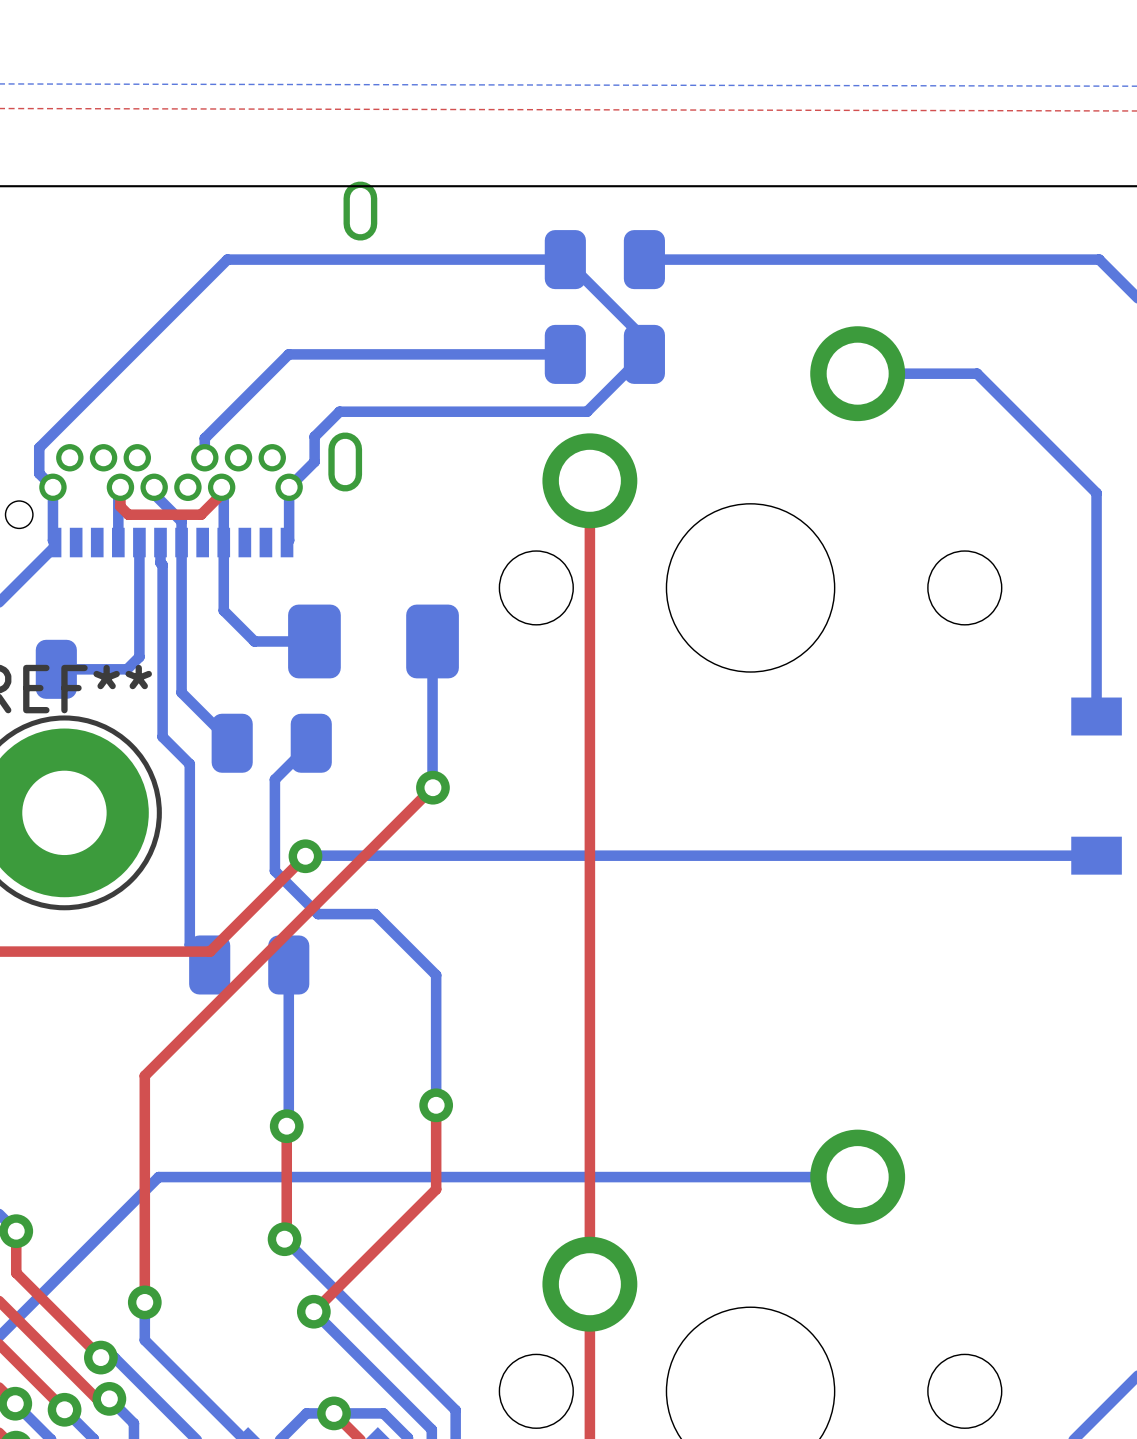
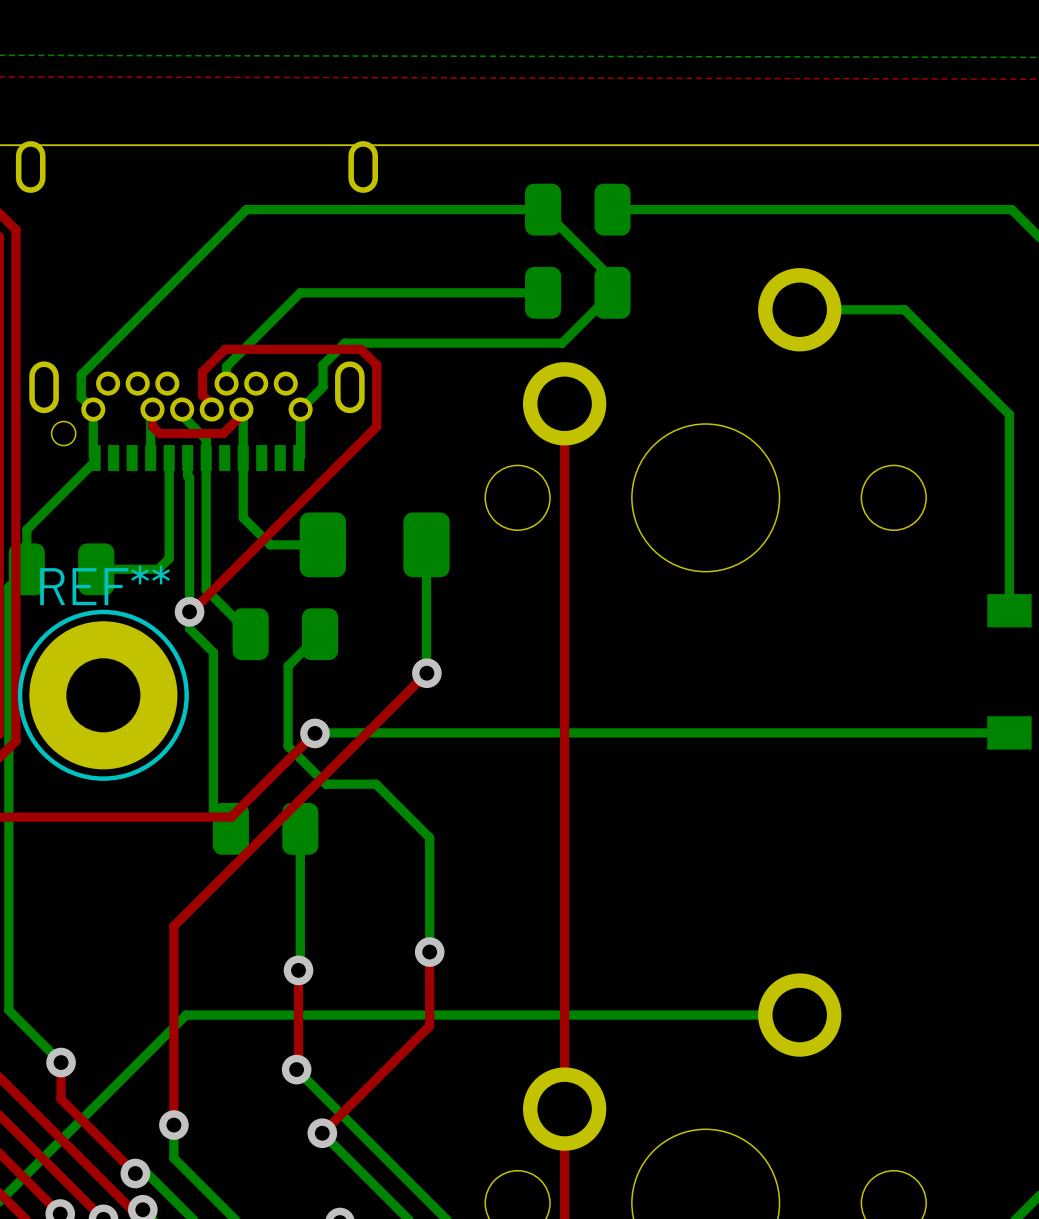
top track: none -> (211, 409) (211, 404) (202, 395) (202, 372) (225, 349) (360, 349) (376, 365) (376, 426) (189, 611)
via: none -> (189, 611)

